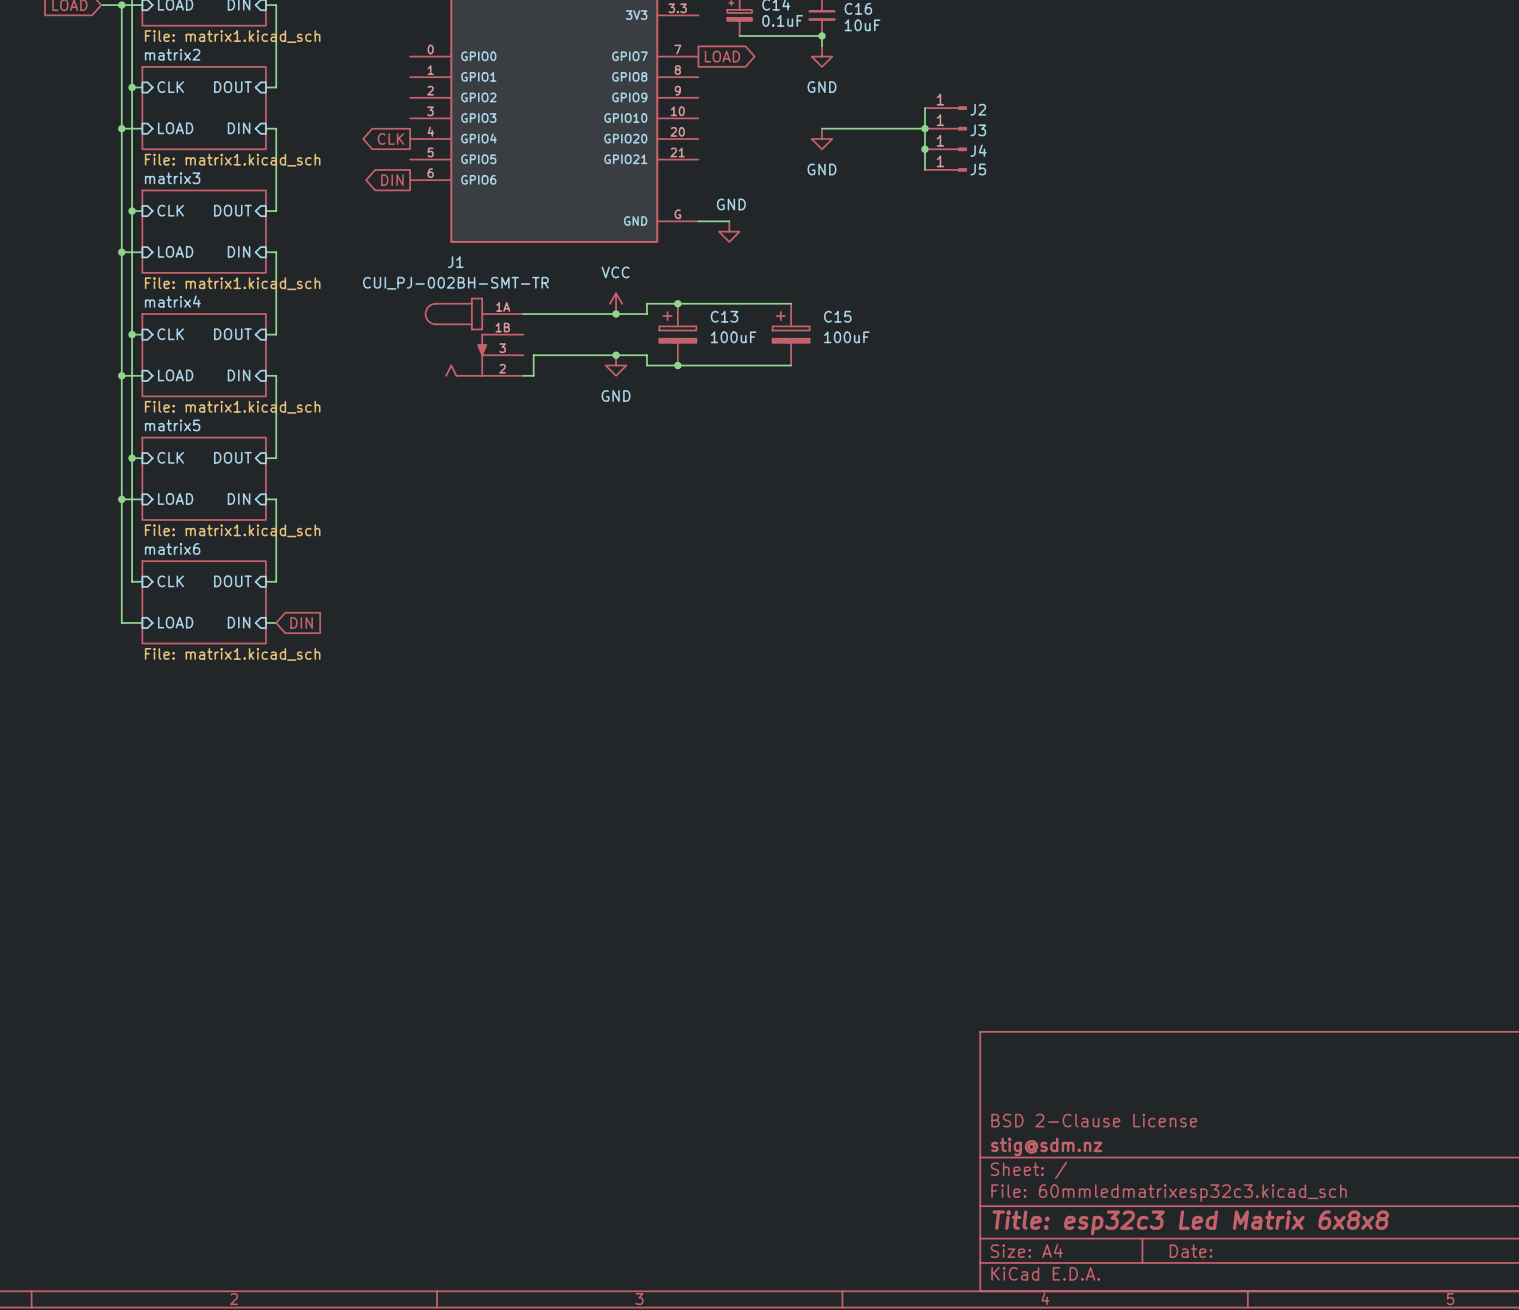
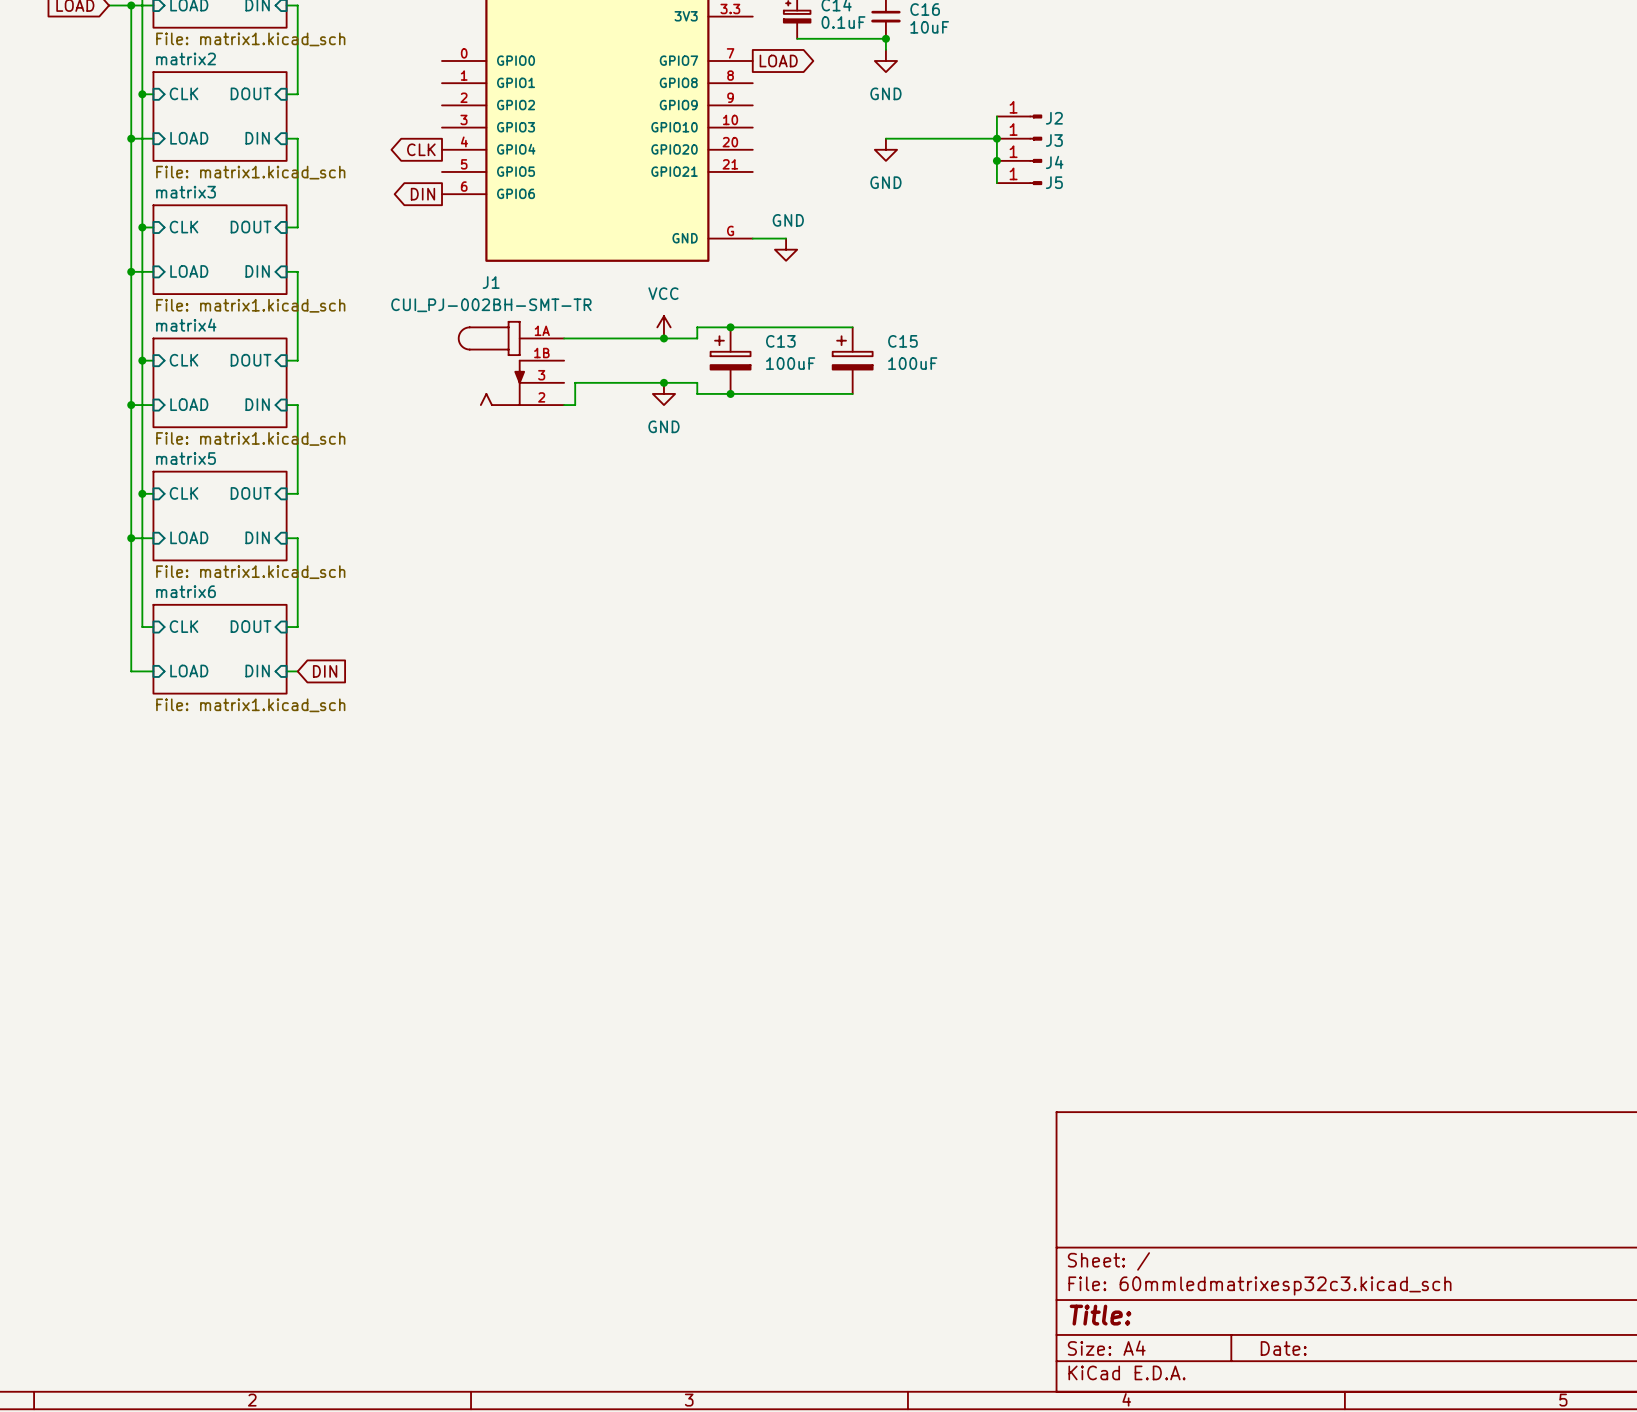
title block: BSD 2-Clause License (1094, 1120) -> none
title block: stig@sdm.nz (1046, 1146) -> none
title block: Title: esp32c3 Led Matrix 6x8x8 (1190, 1222) -> Title: (1100, 1315)

